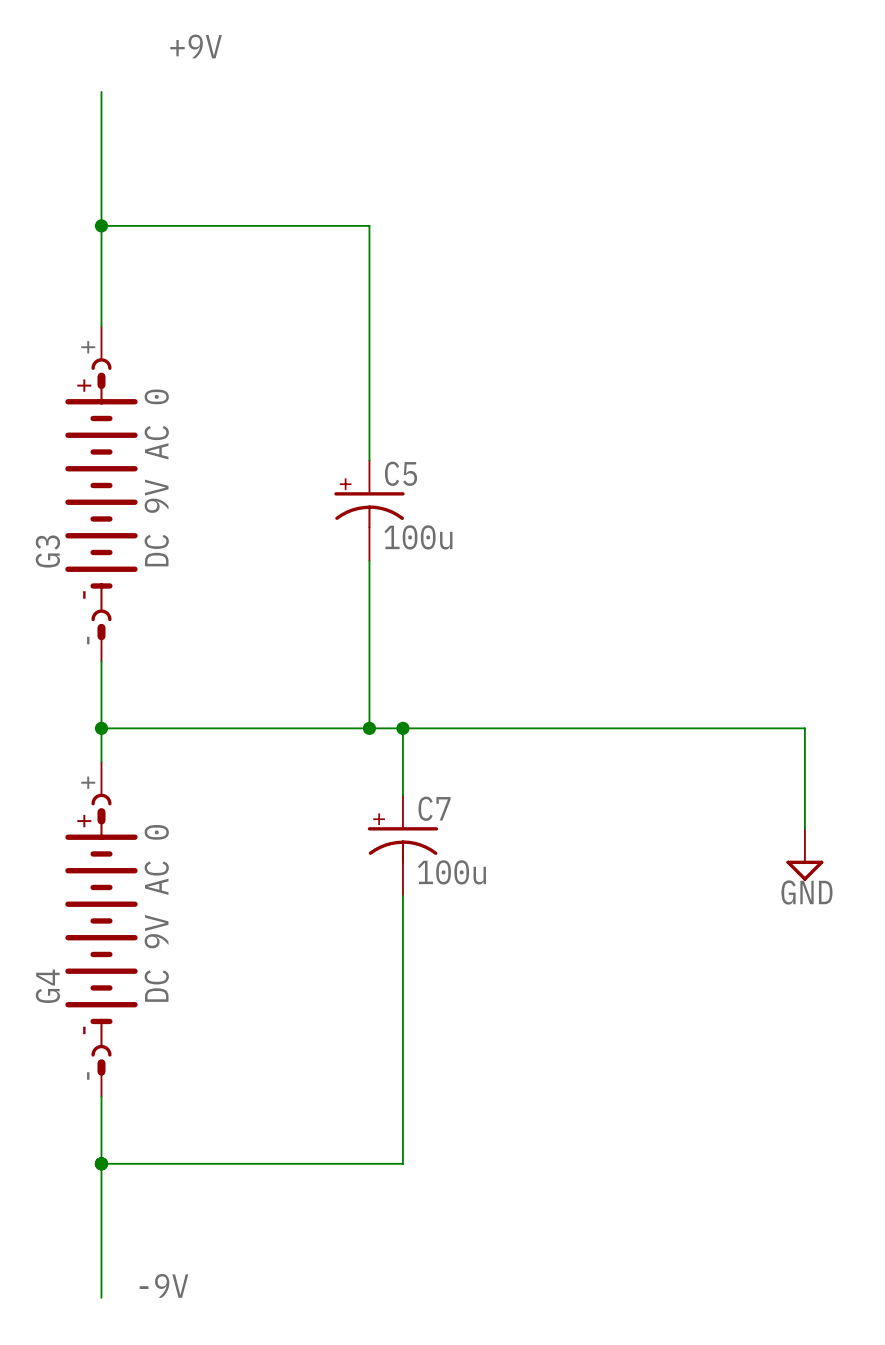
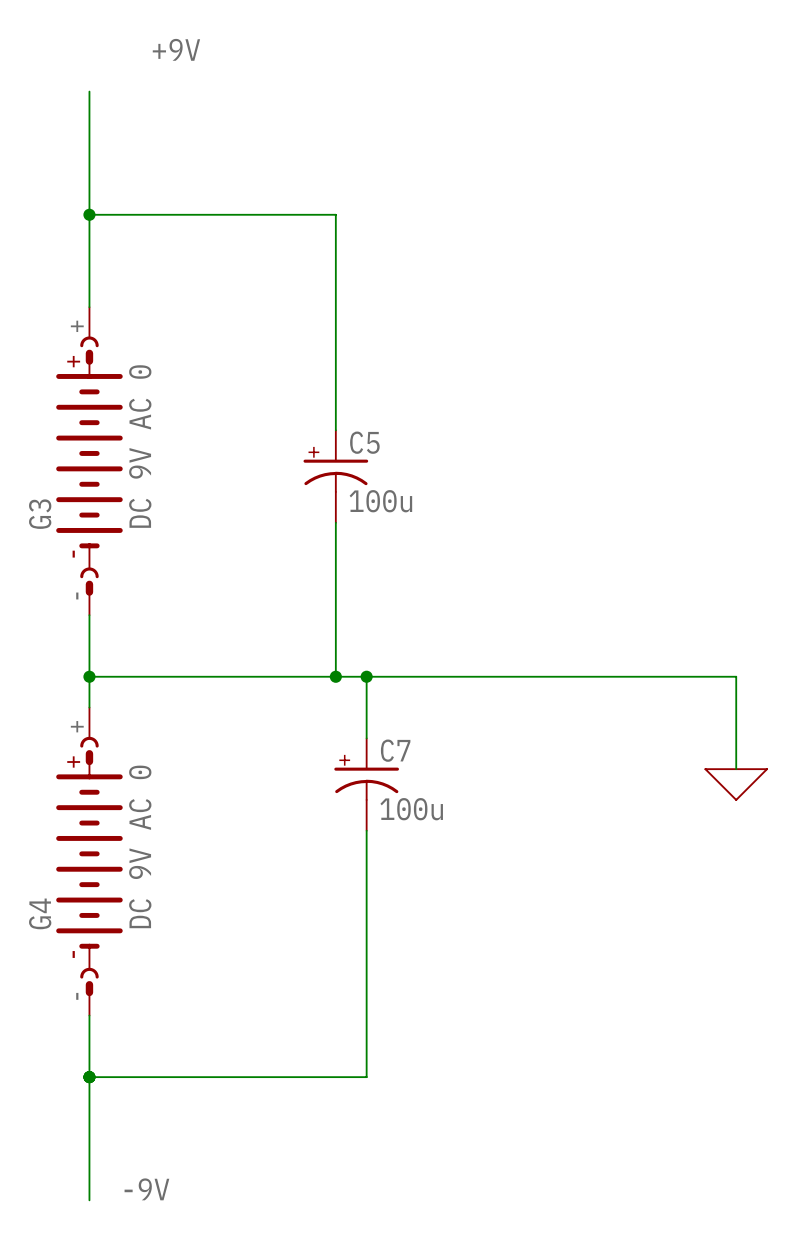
power symbol shape: [786, 828, 824, 881] -> [704, 768, 768, 801]
power symbol text: GND (807, 892) -> none

